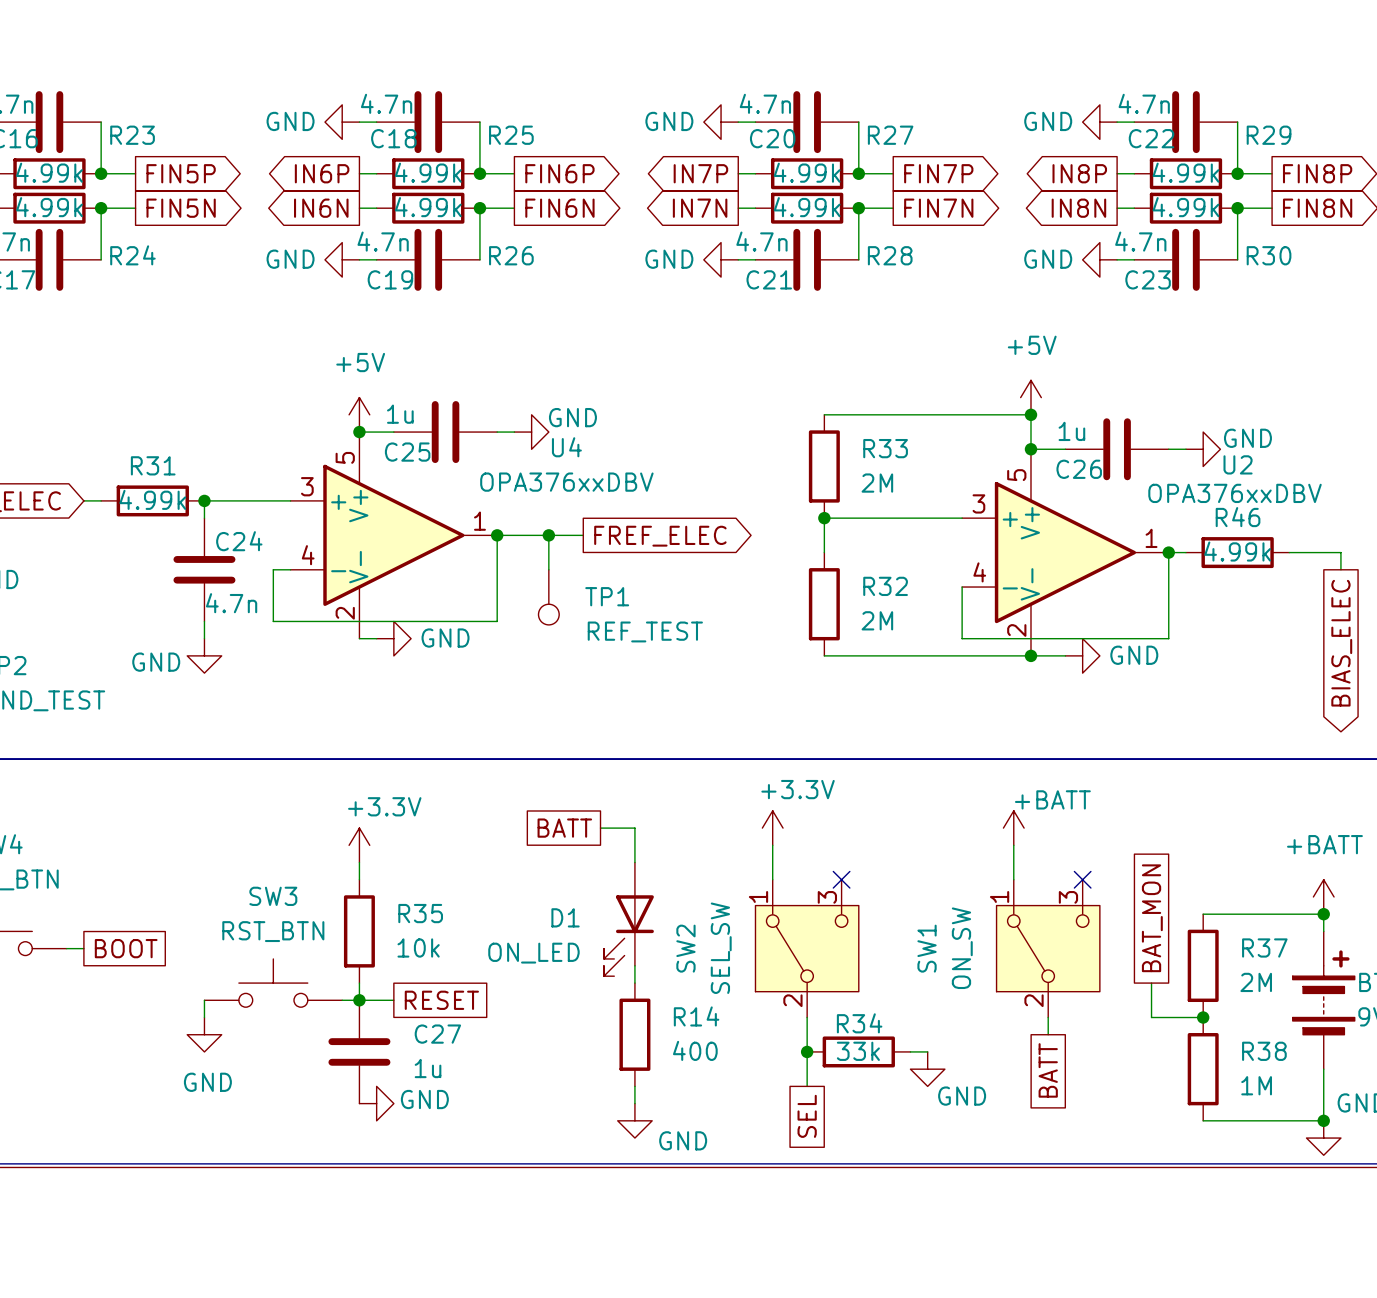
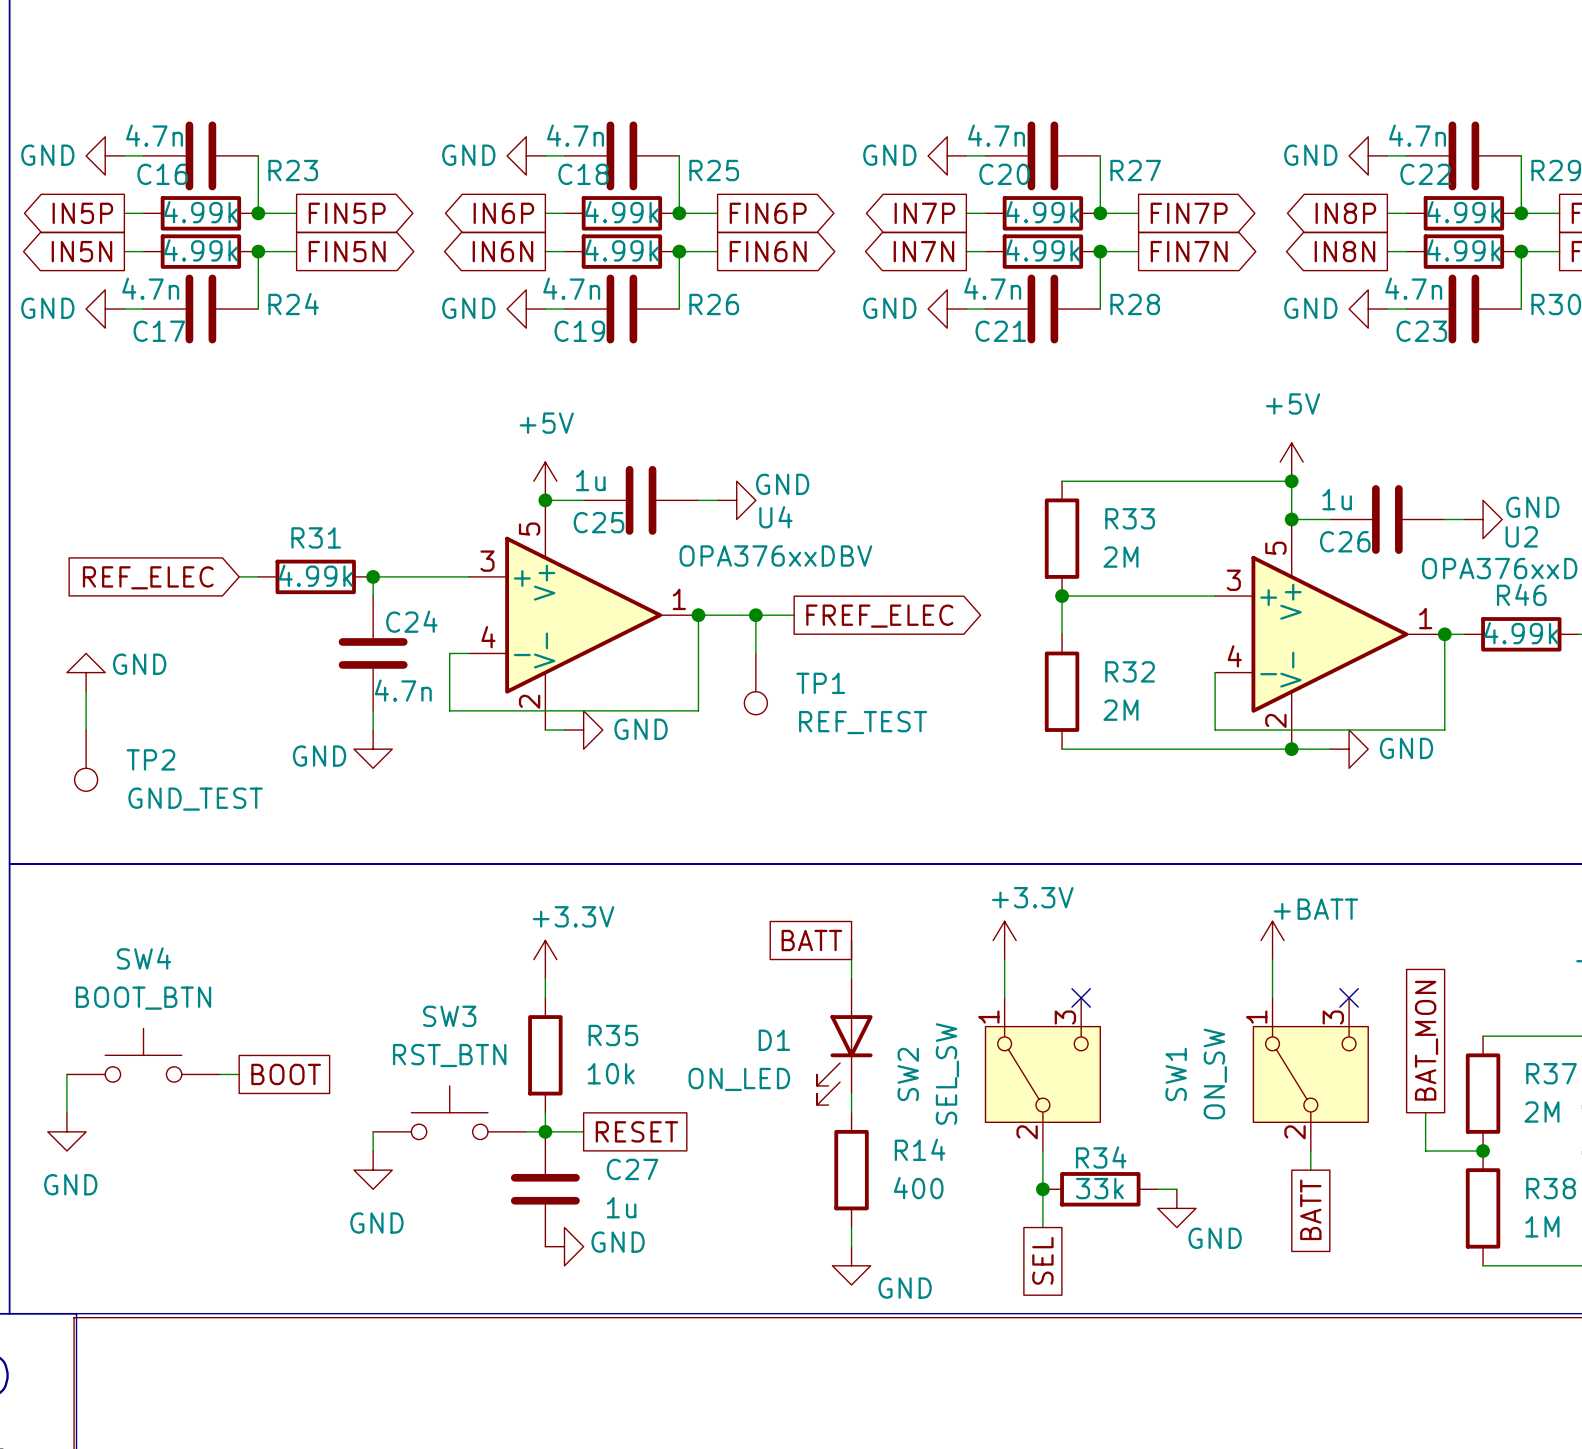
global label position: BATT (564, 828) -> BATT (811, 940)
wire: (600, 828) (634, 828) -> none

